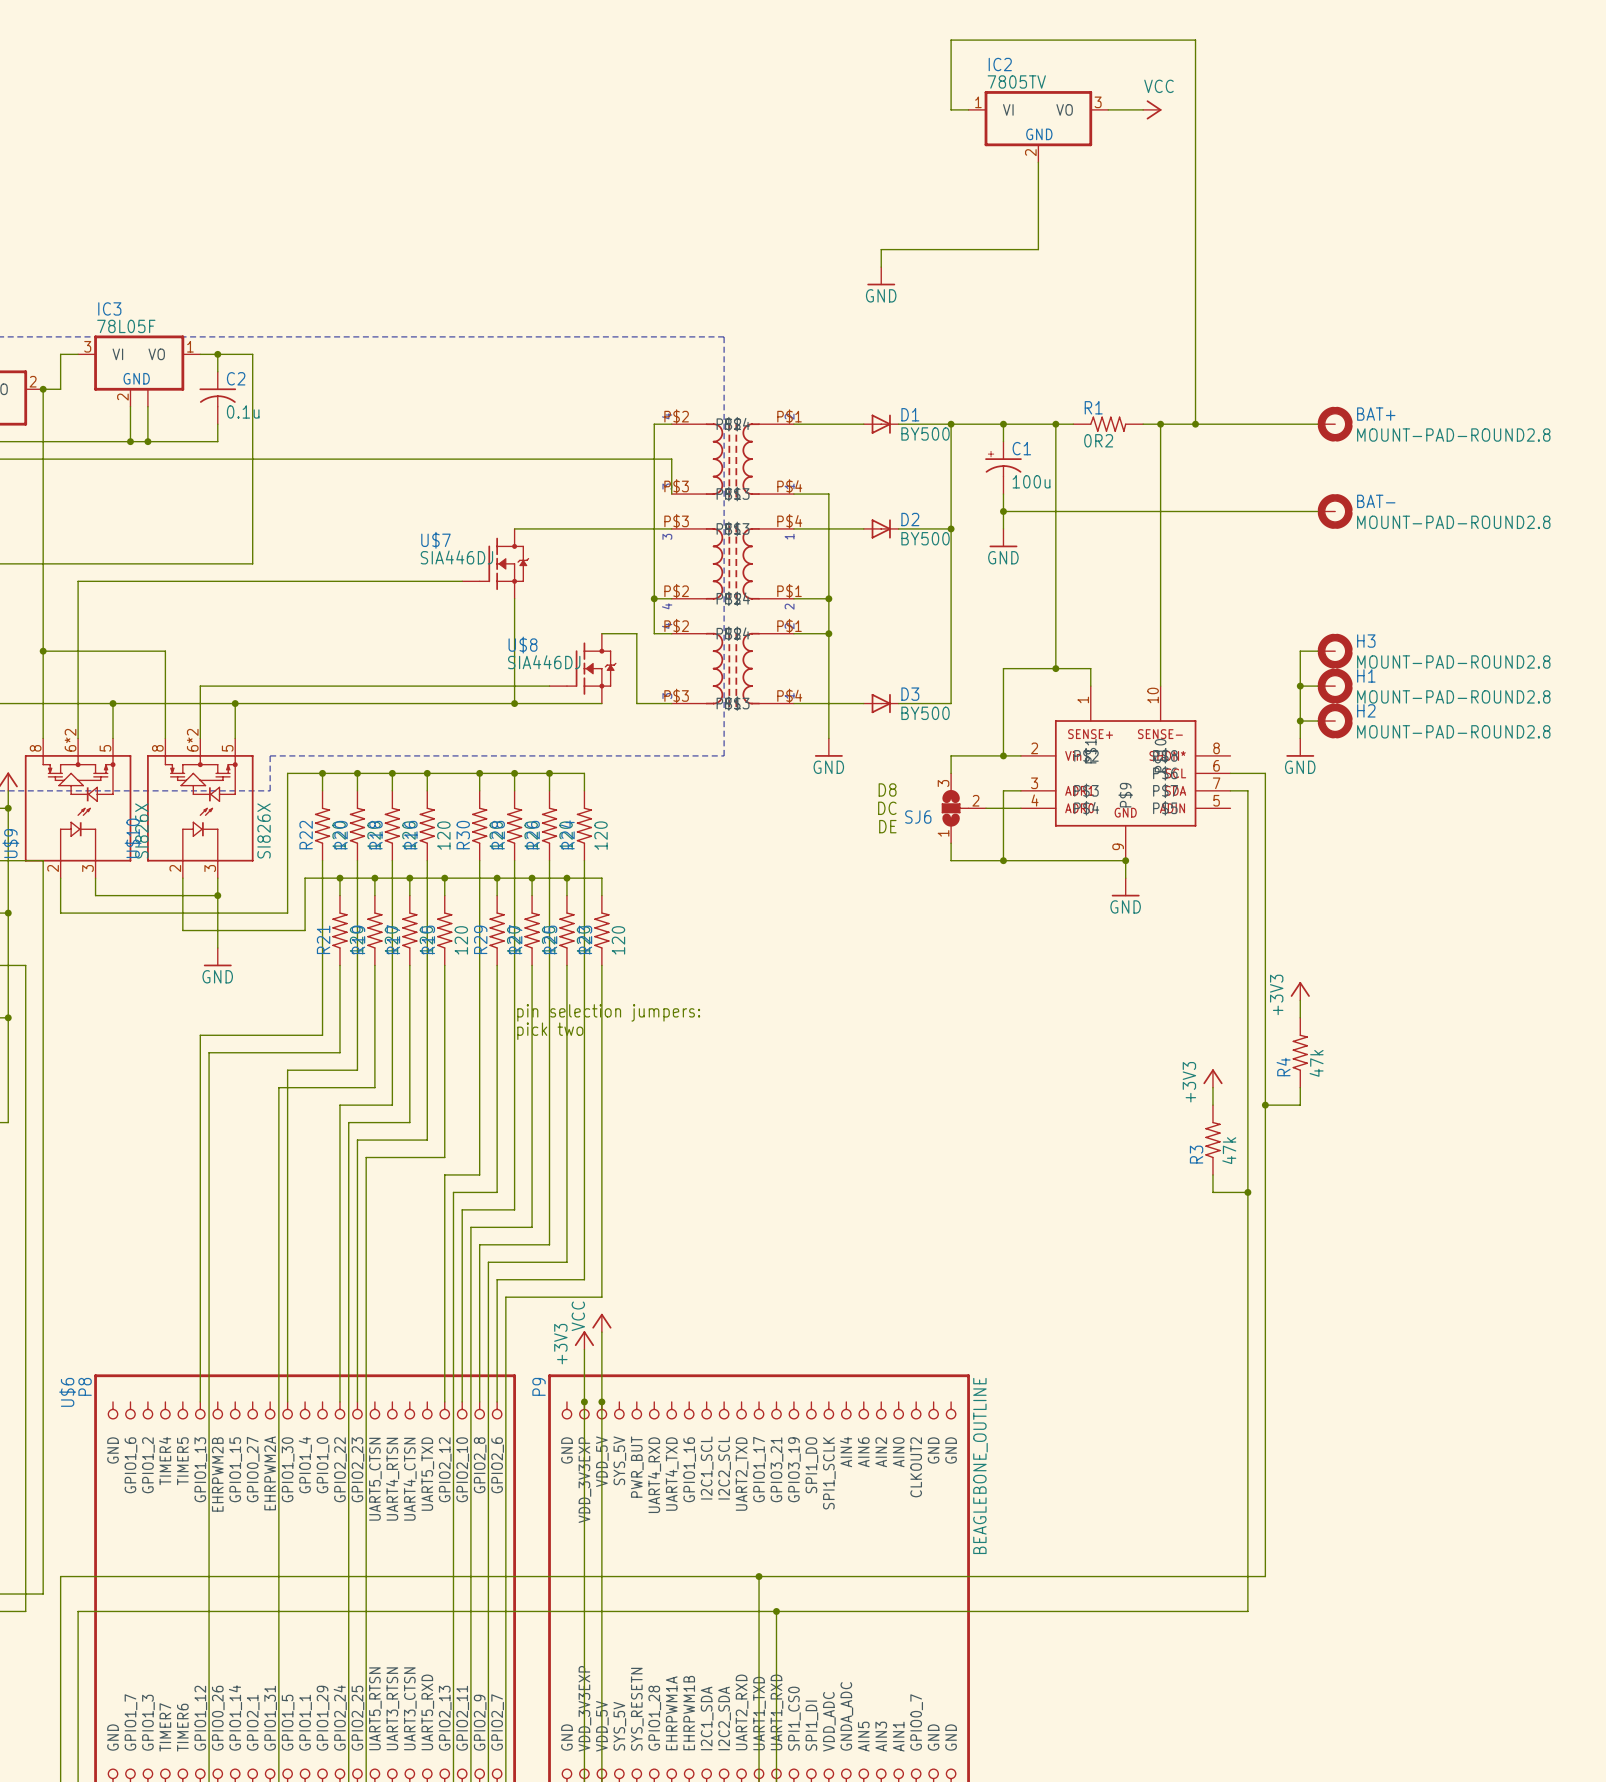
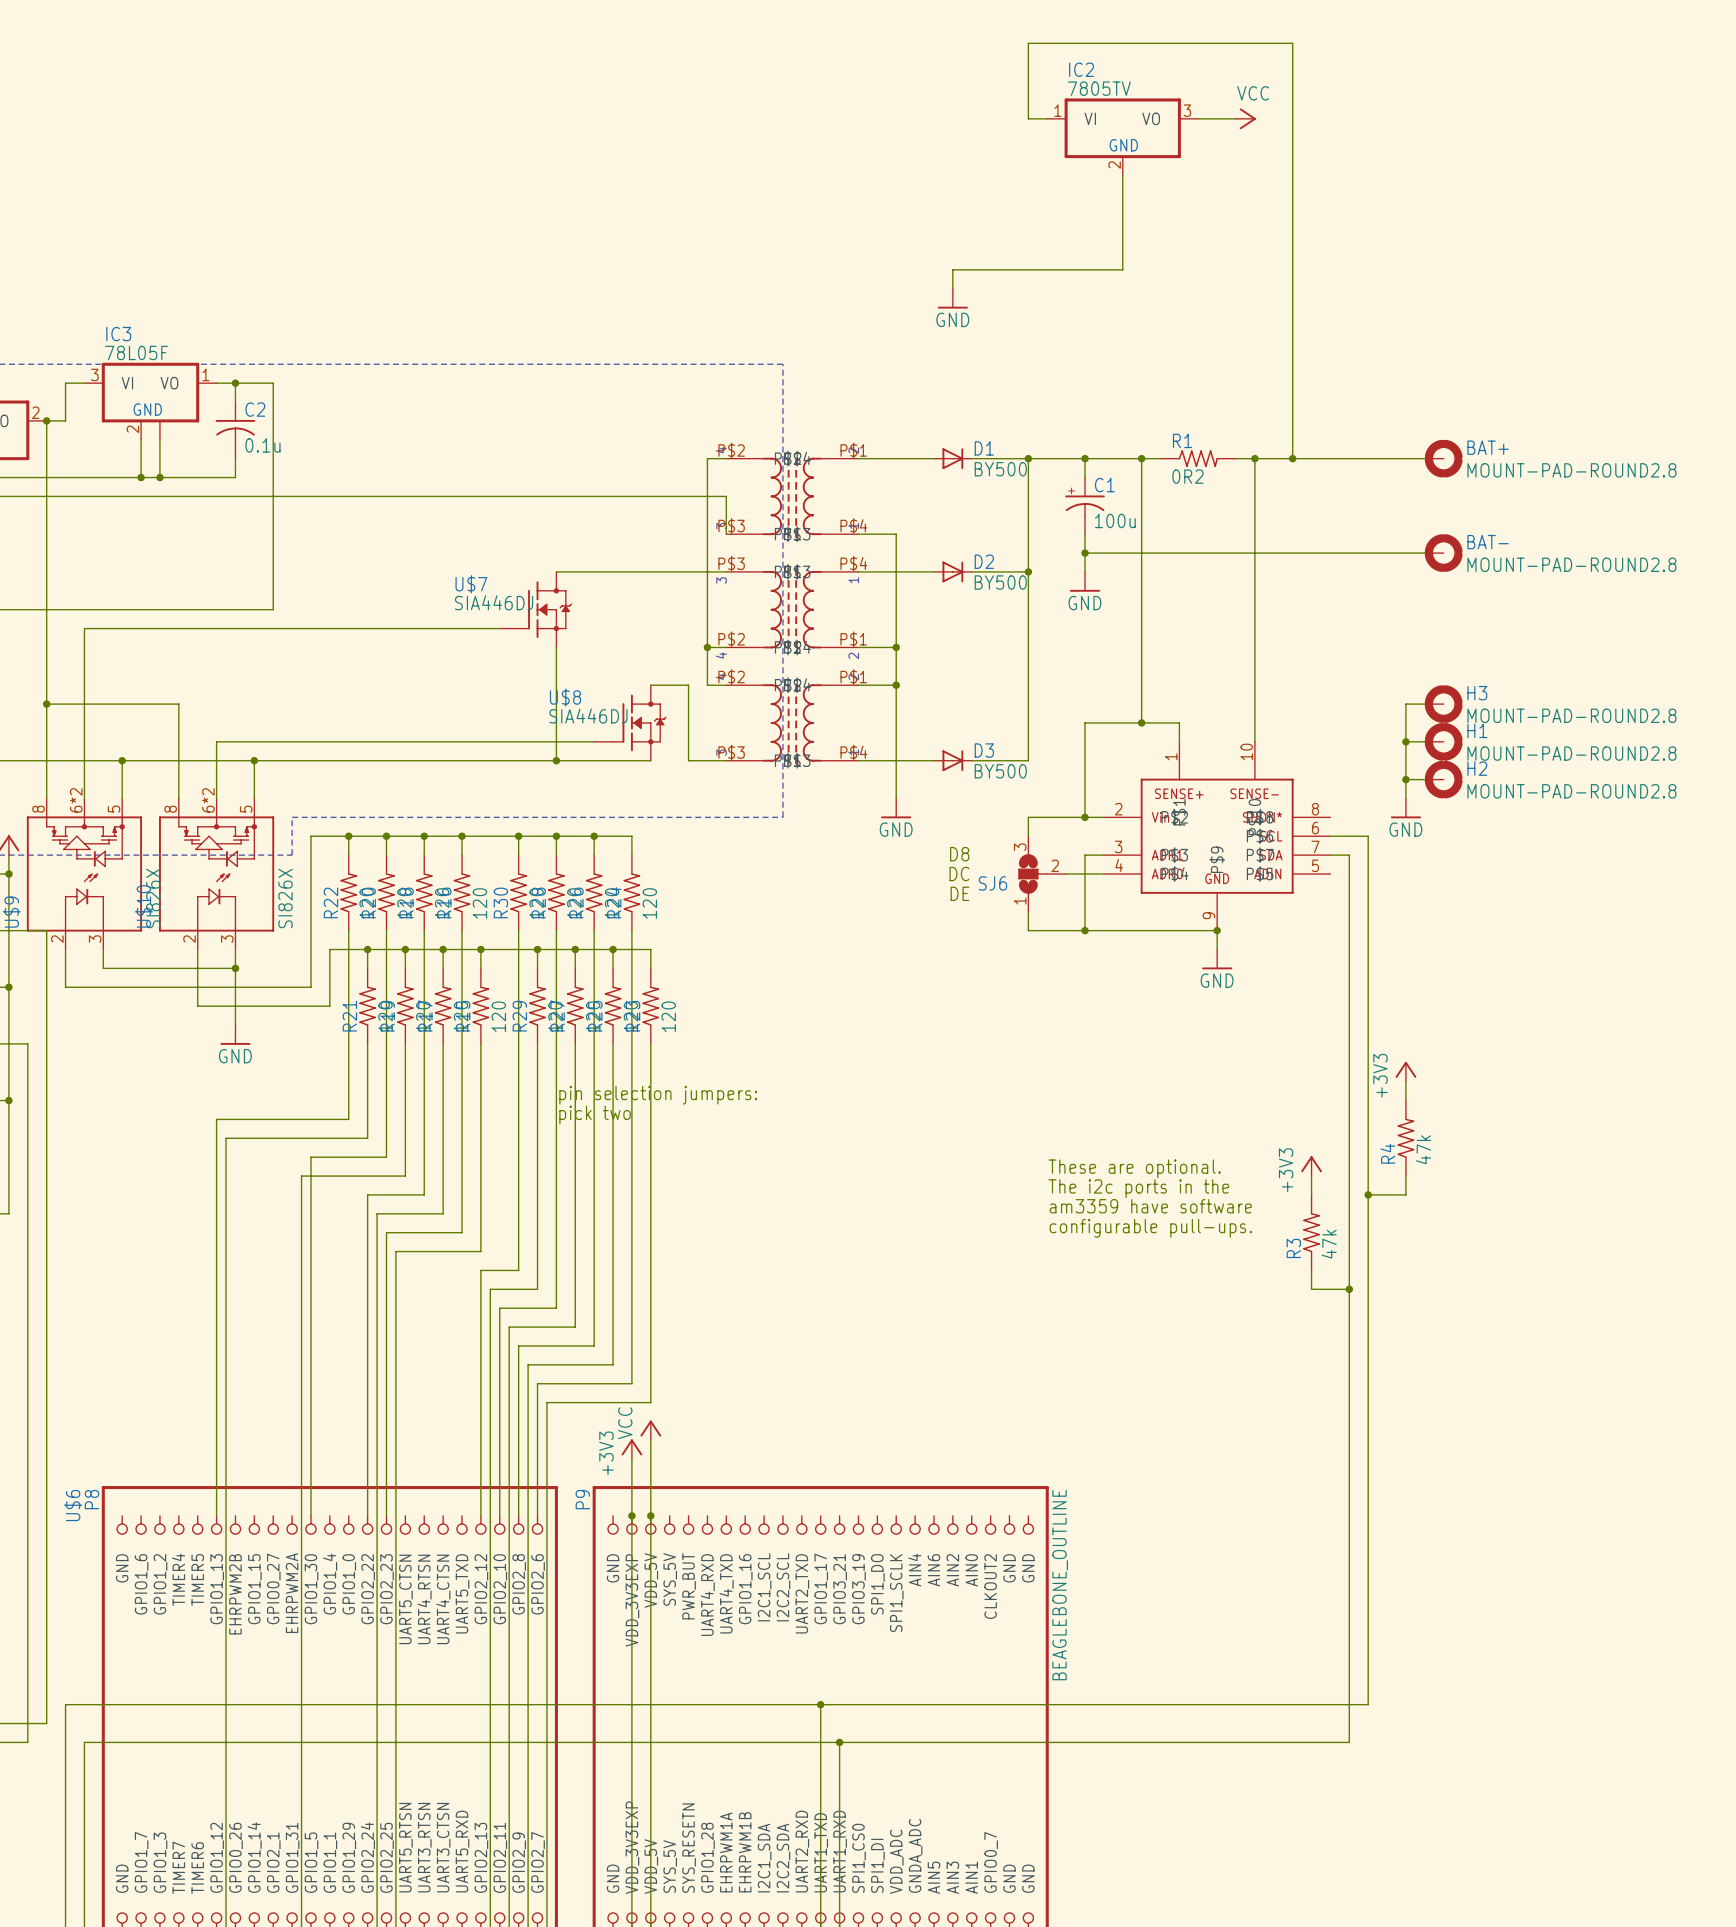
text: none -> These are optional. (1134, 1168)
text: none -> The i2c ports in the (1138, 1188)
text: none -> am3359 have software (1150, 1206)
text: none -> configurable pull-ups. (1150, 1228)

